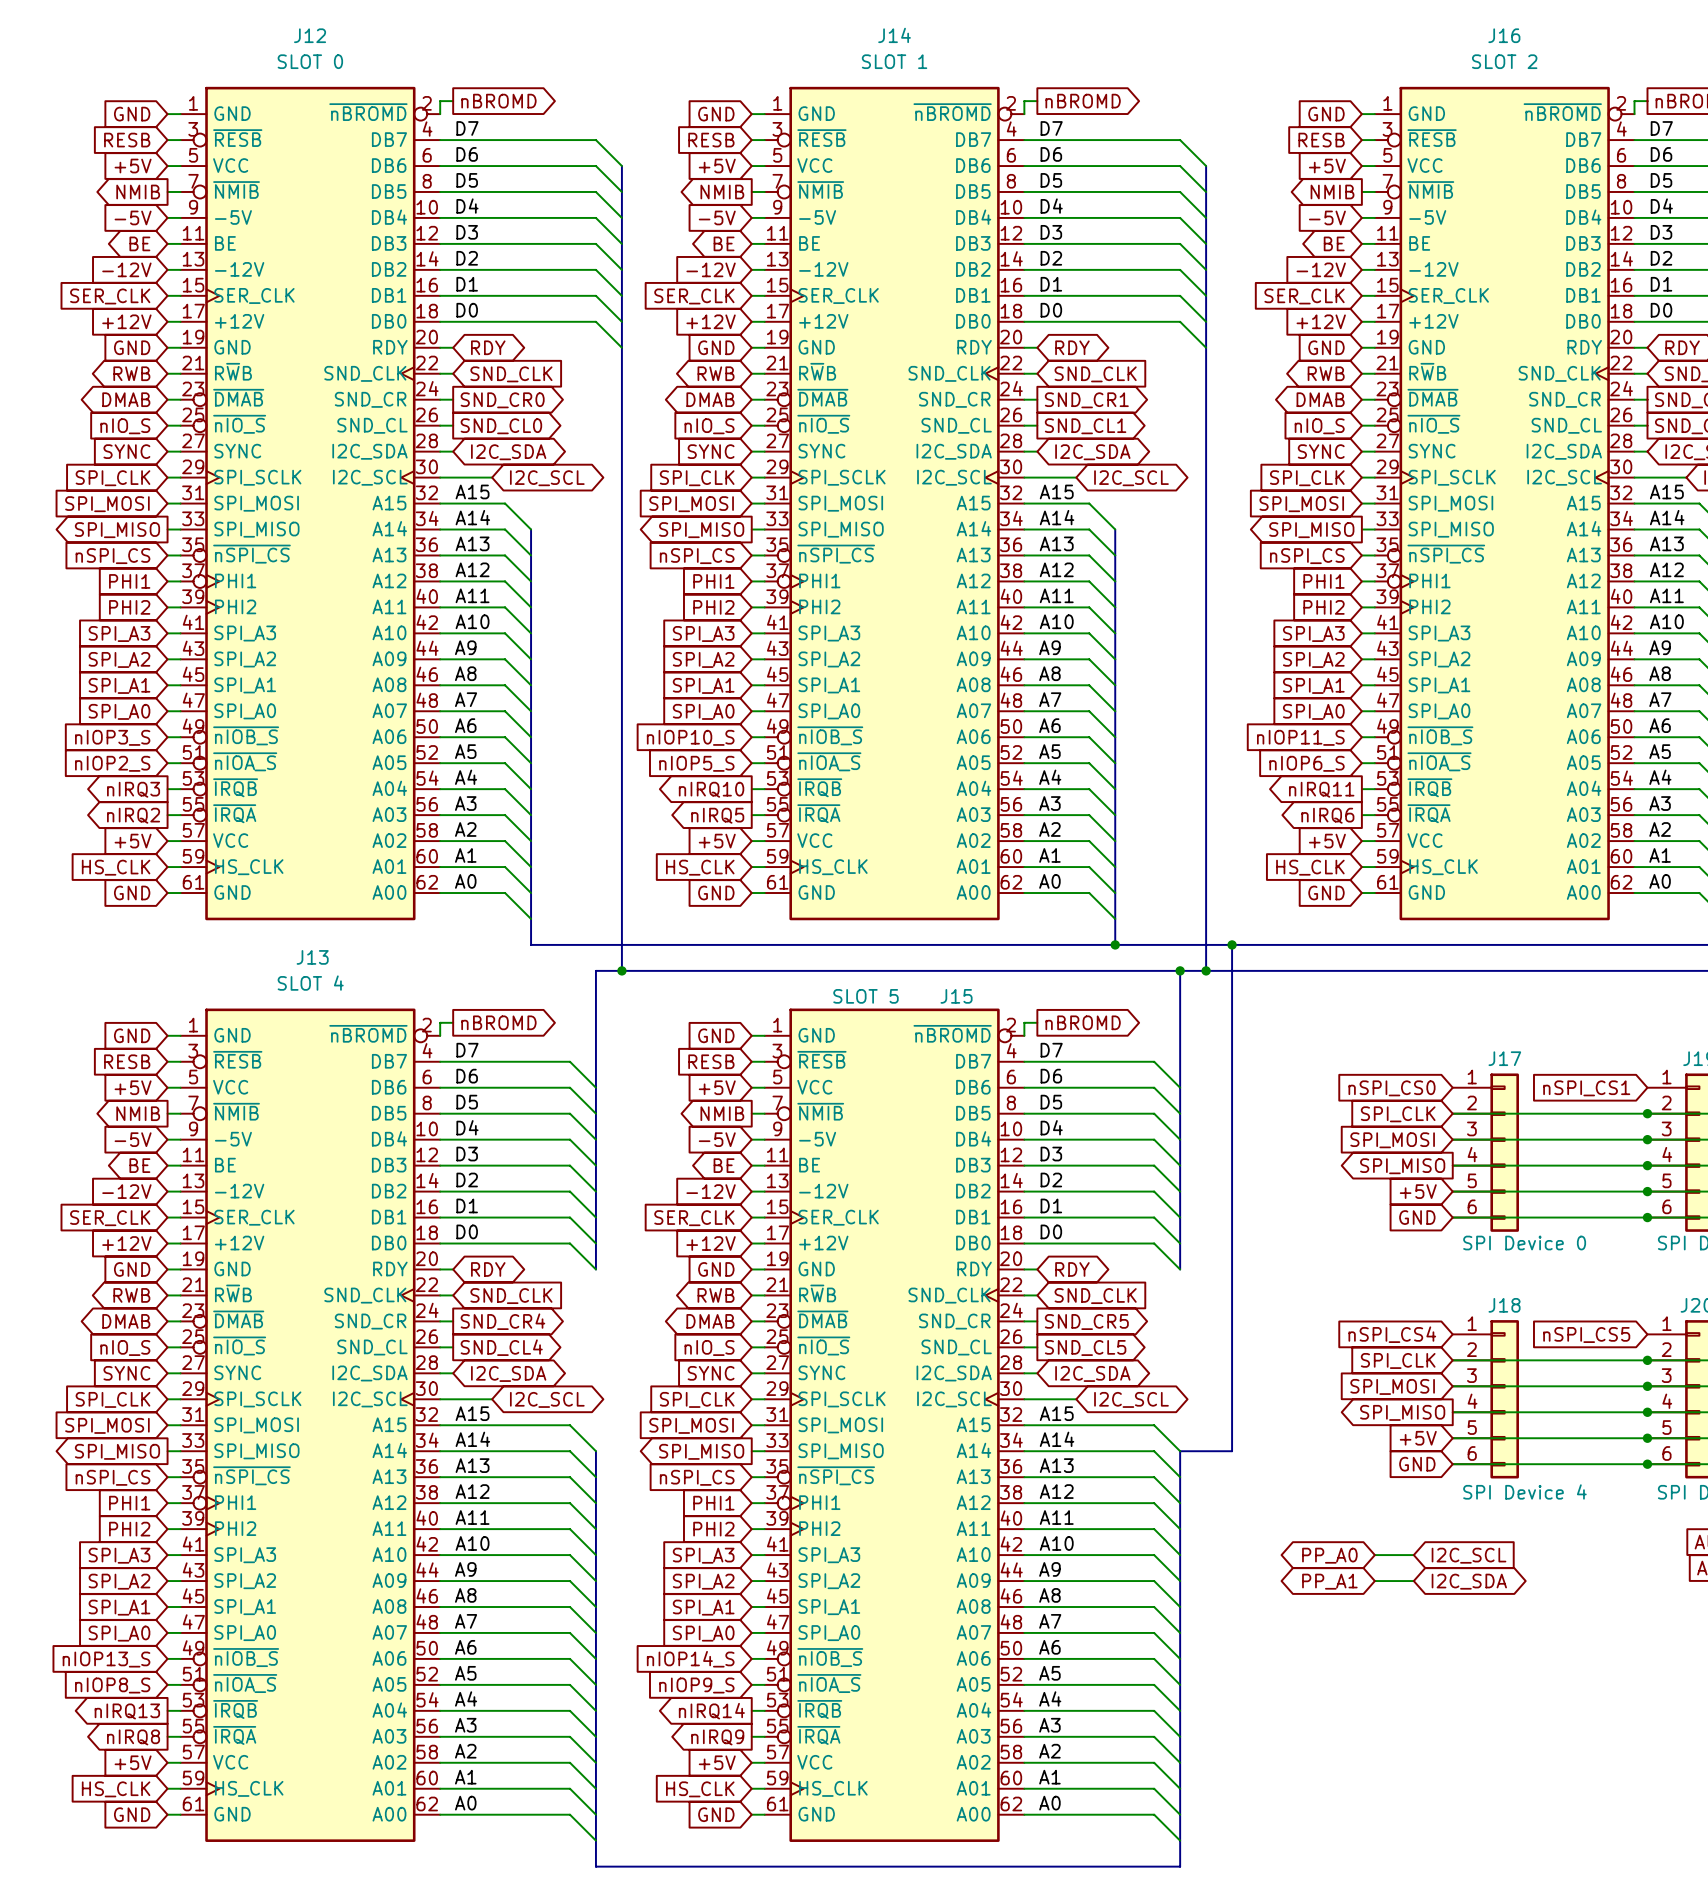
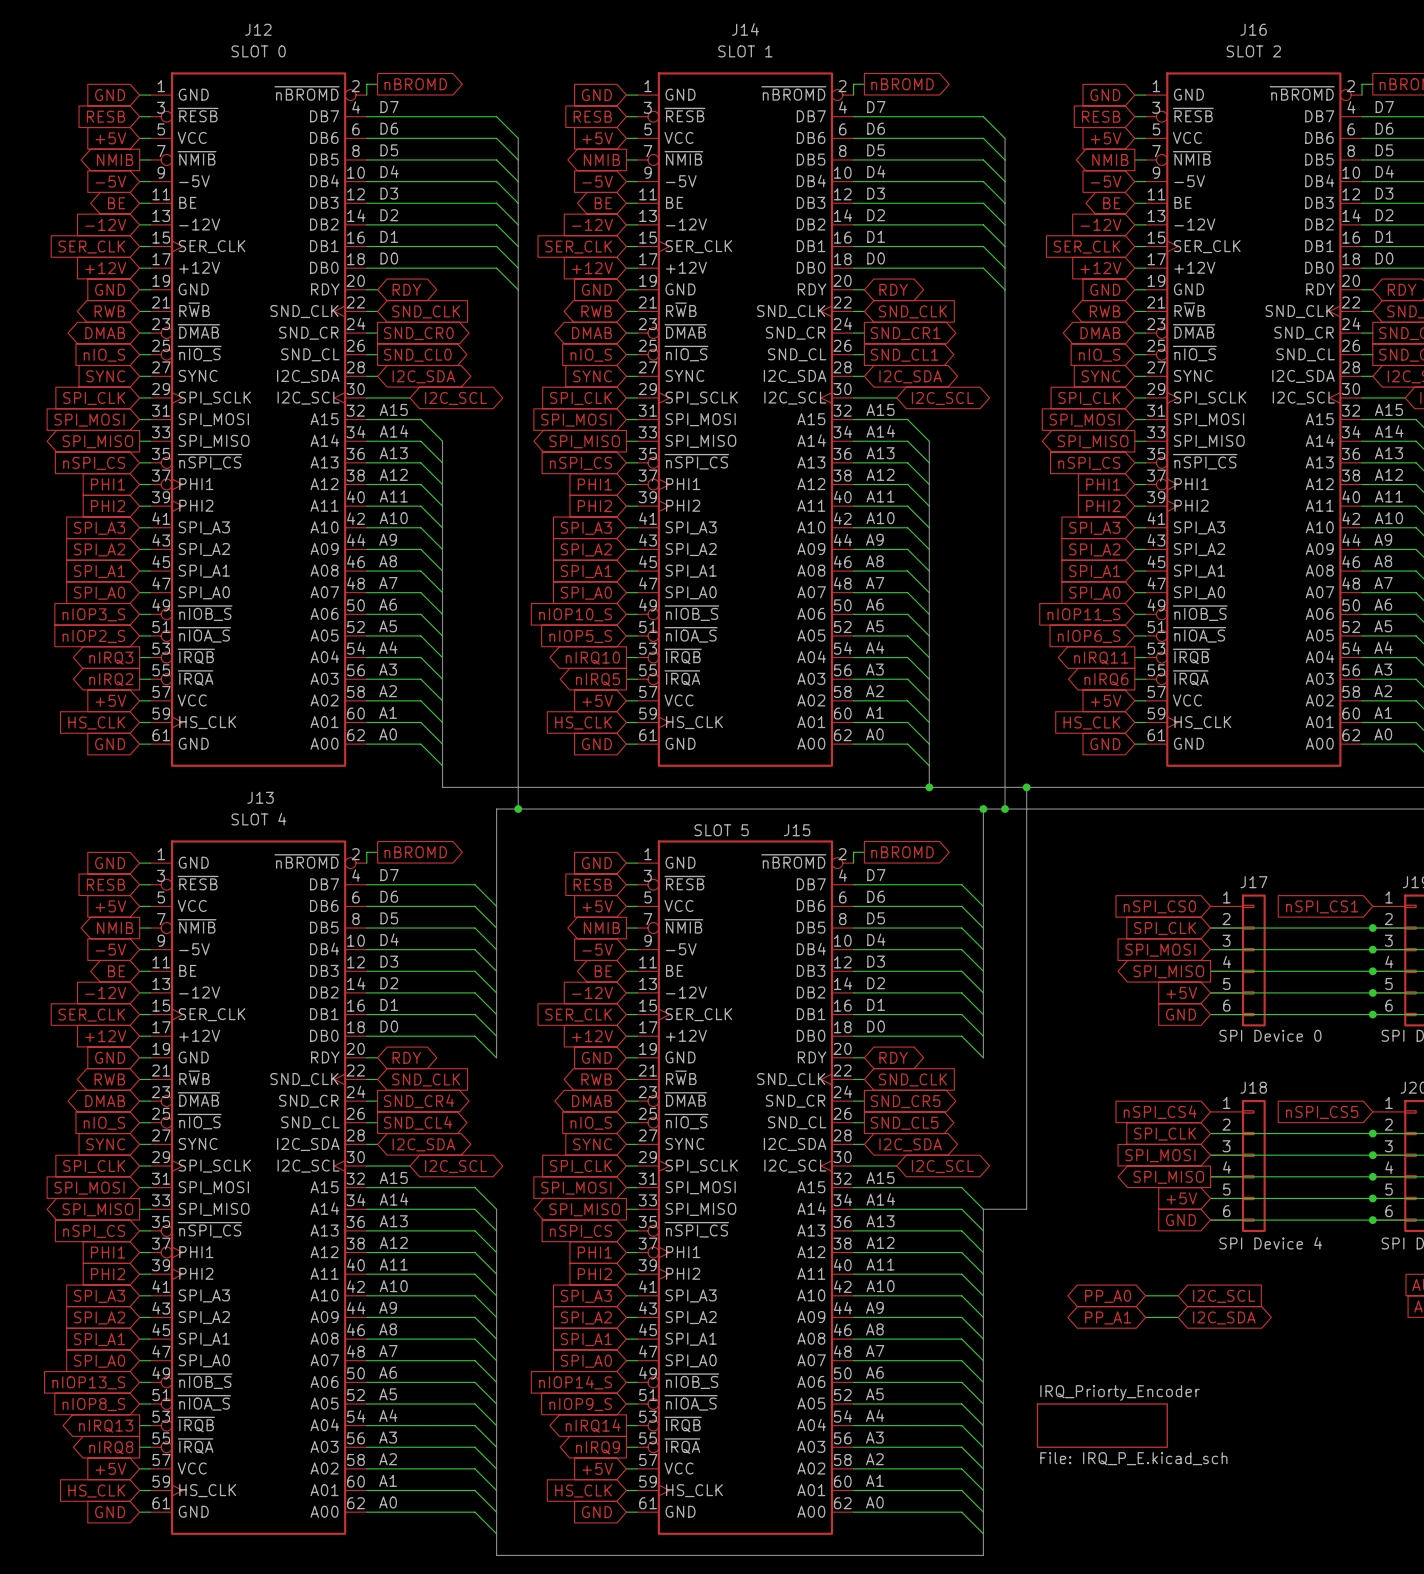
sheet IRQ_Priorty_Encoder: none -> File: IRQ_P_E.kicad_sch (1102, 1425)

